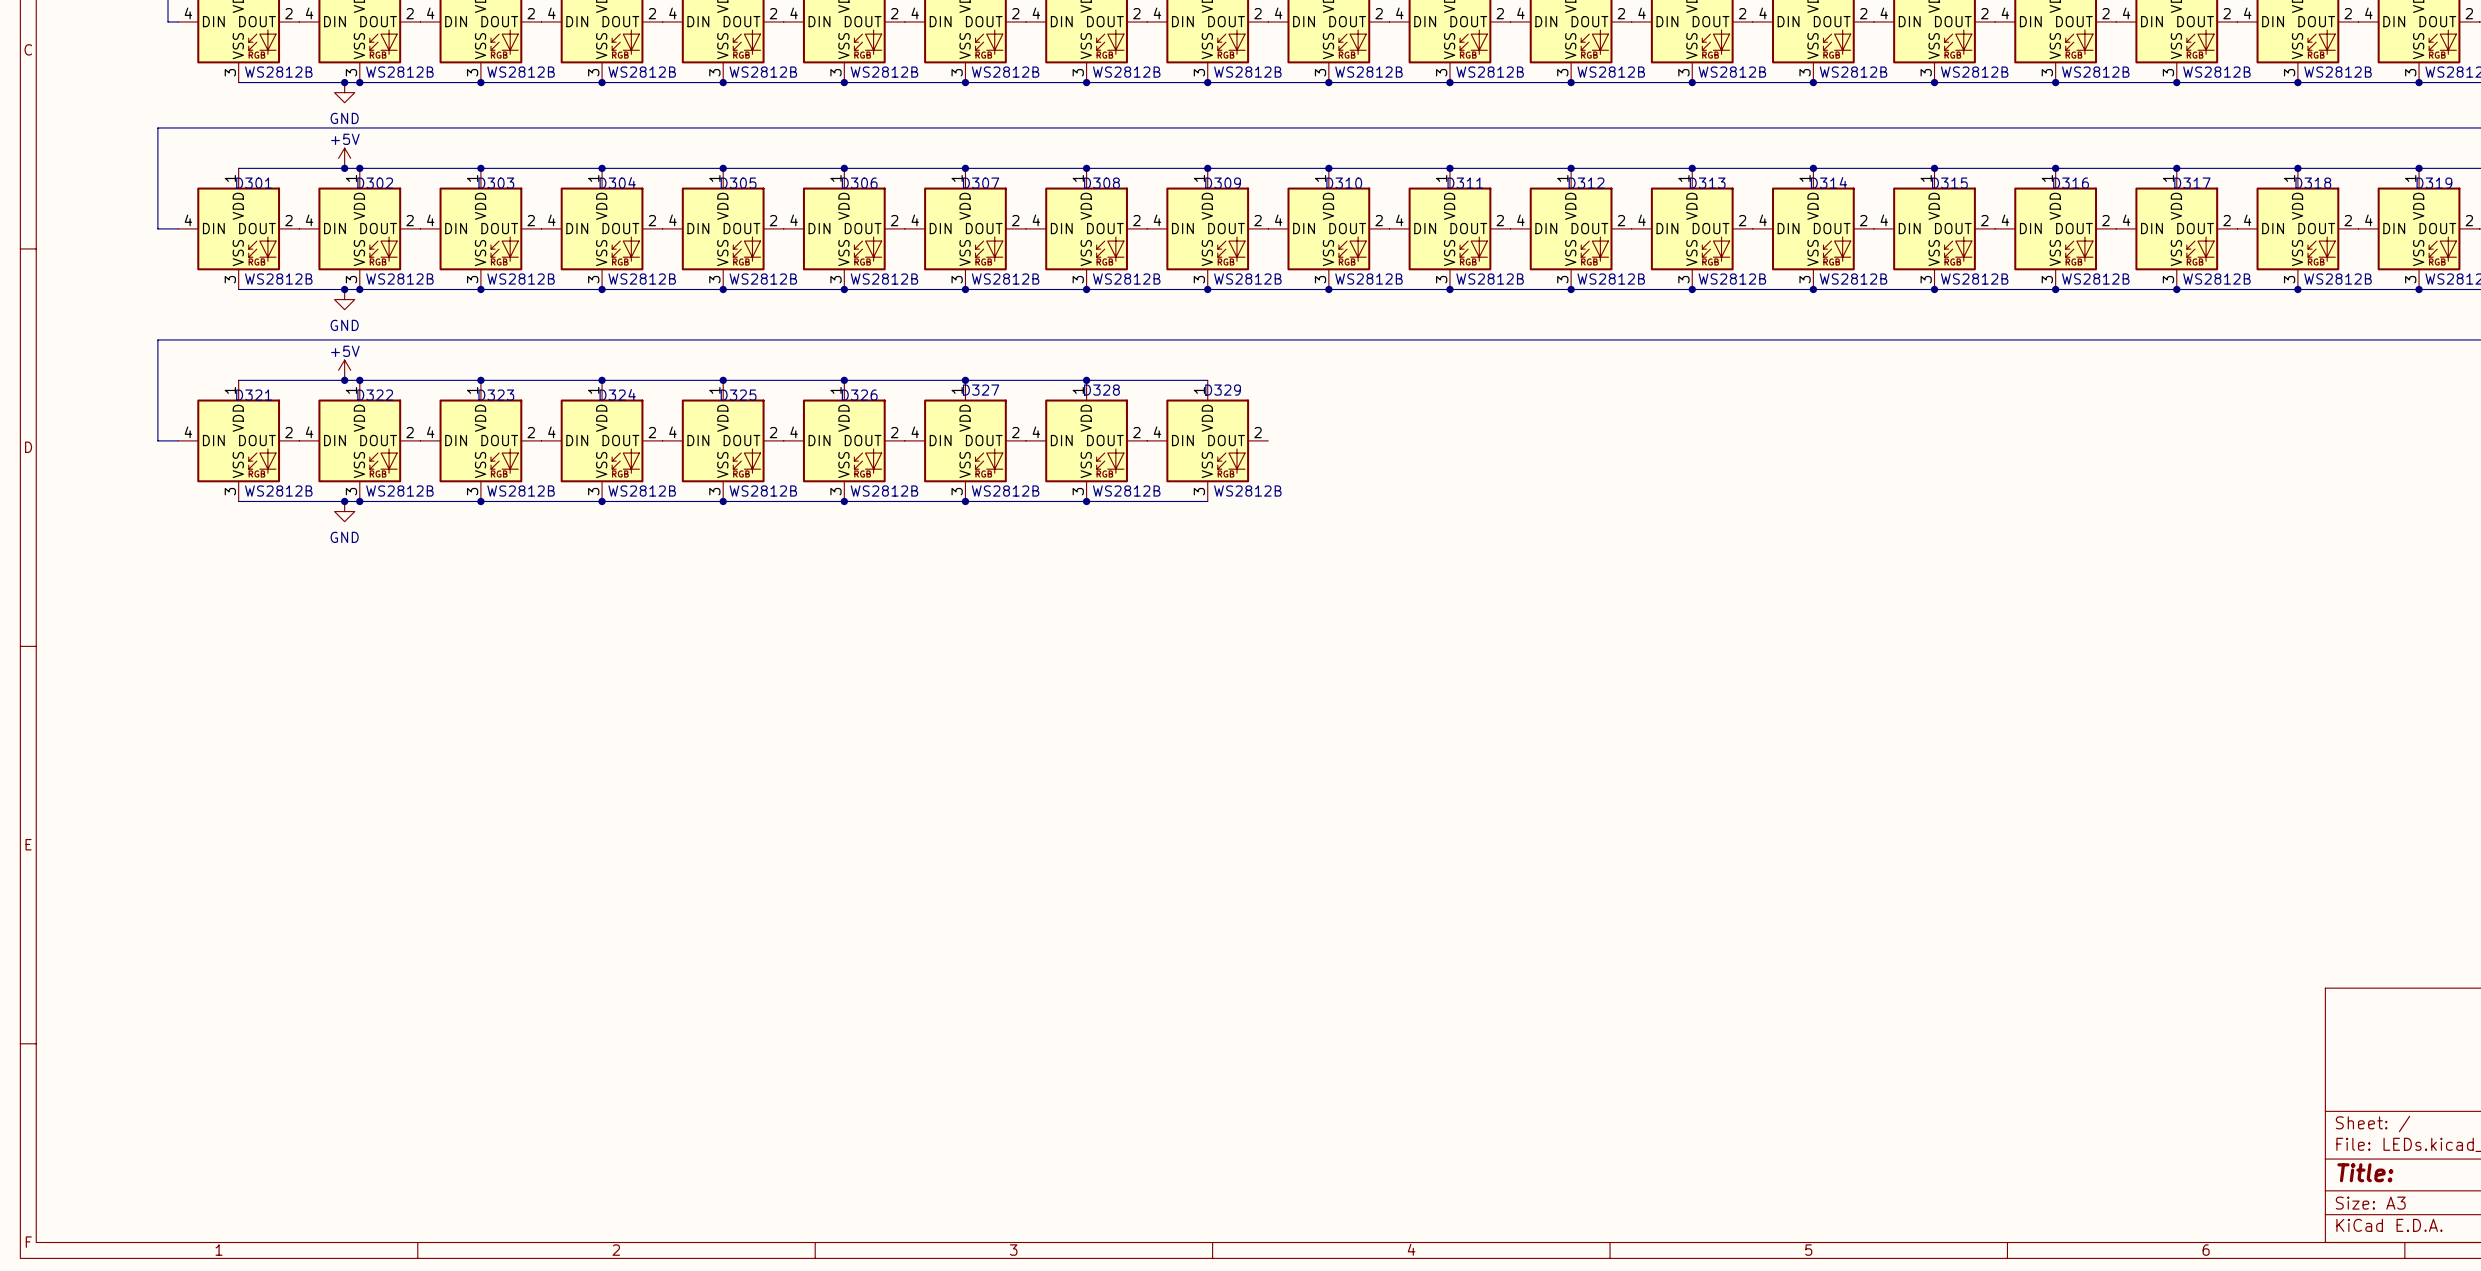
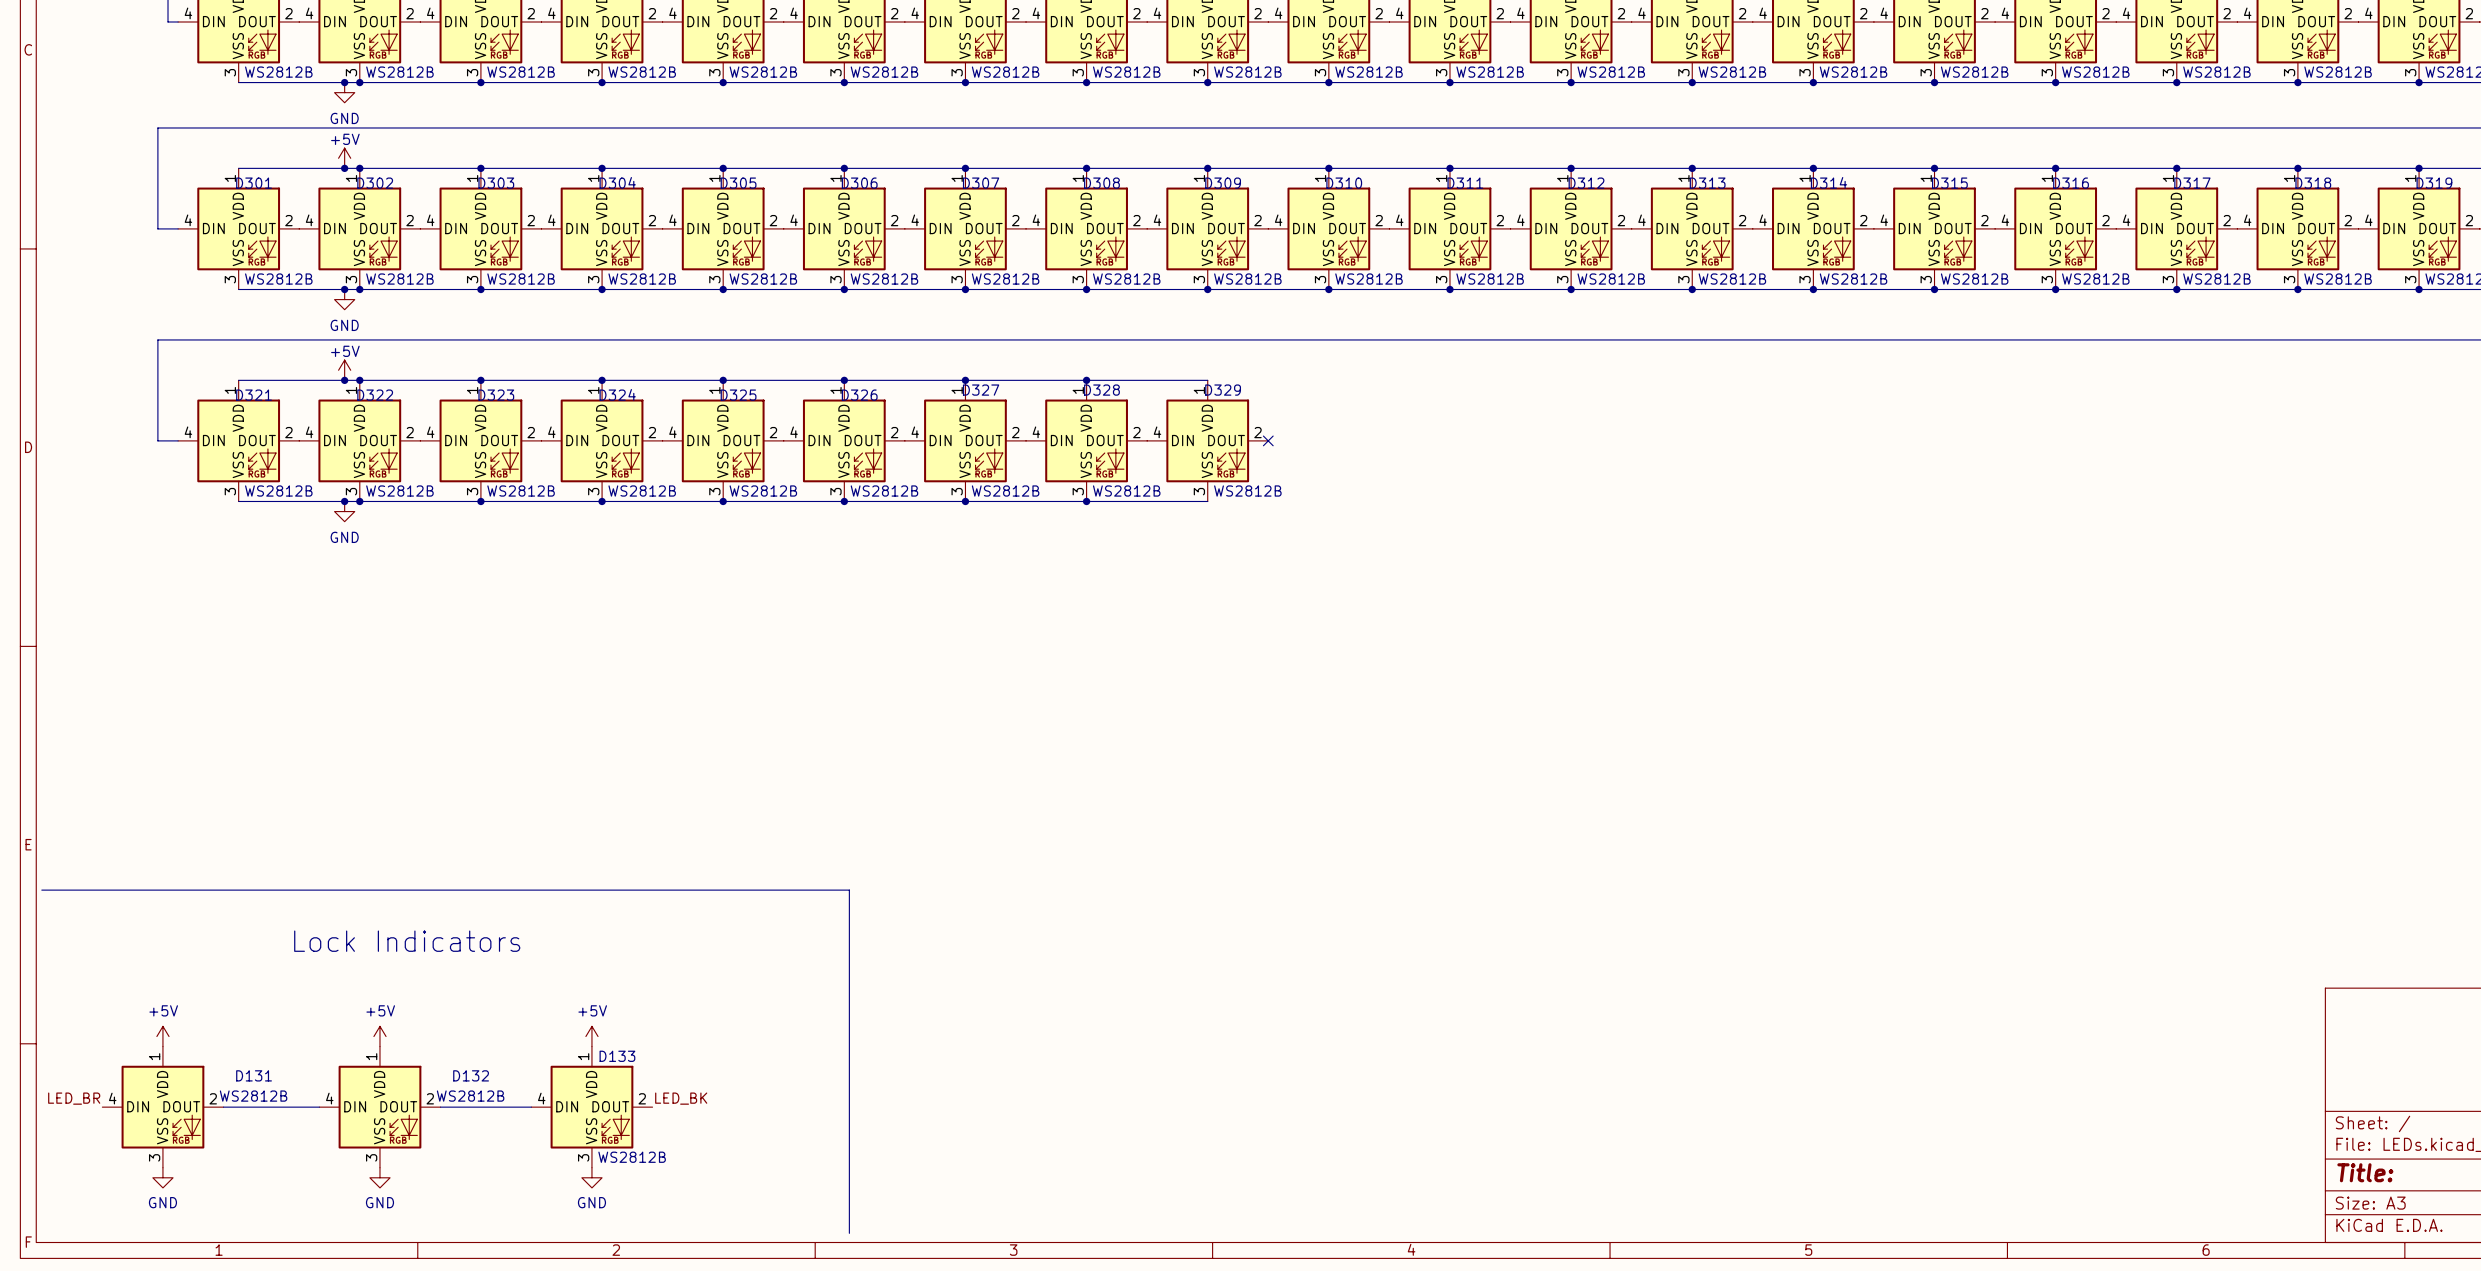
no-connect mark: none -> (1268, 440)
line: none -> (41, 890) (849, 890) (849, 1233)
text: none -> Lock Indicators (407, 941)
power symbol: none -> +5V (162, 1036)
power symbol: none -> +5V (379, 1036)
power symbol: none -> +5V (591, 1036)
label: none -> LED_BR (74, 1098)
label: none -> LED_BK (681, 1098)
D131: none -> WS2812B (162, 1107)
wire: none -> (223, 1107) (319, 1107)
D132: none -> WS2812B (379, 1107)
wire: none -> (440, 1107) (531, 1107)
D133: none -> WS2812B (591, 1107)
power symbol: none -> GND (162, 1177)
power symbol: none -> GND (379, 1177)
power symbol: none -> GND (591, 1177)

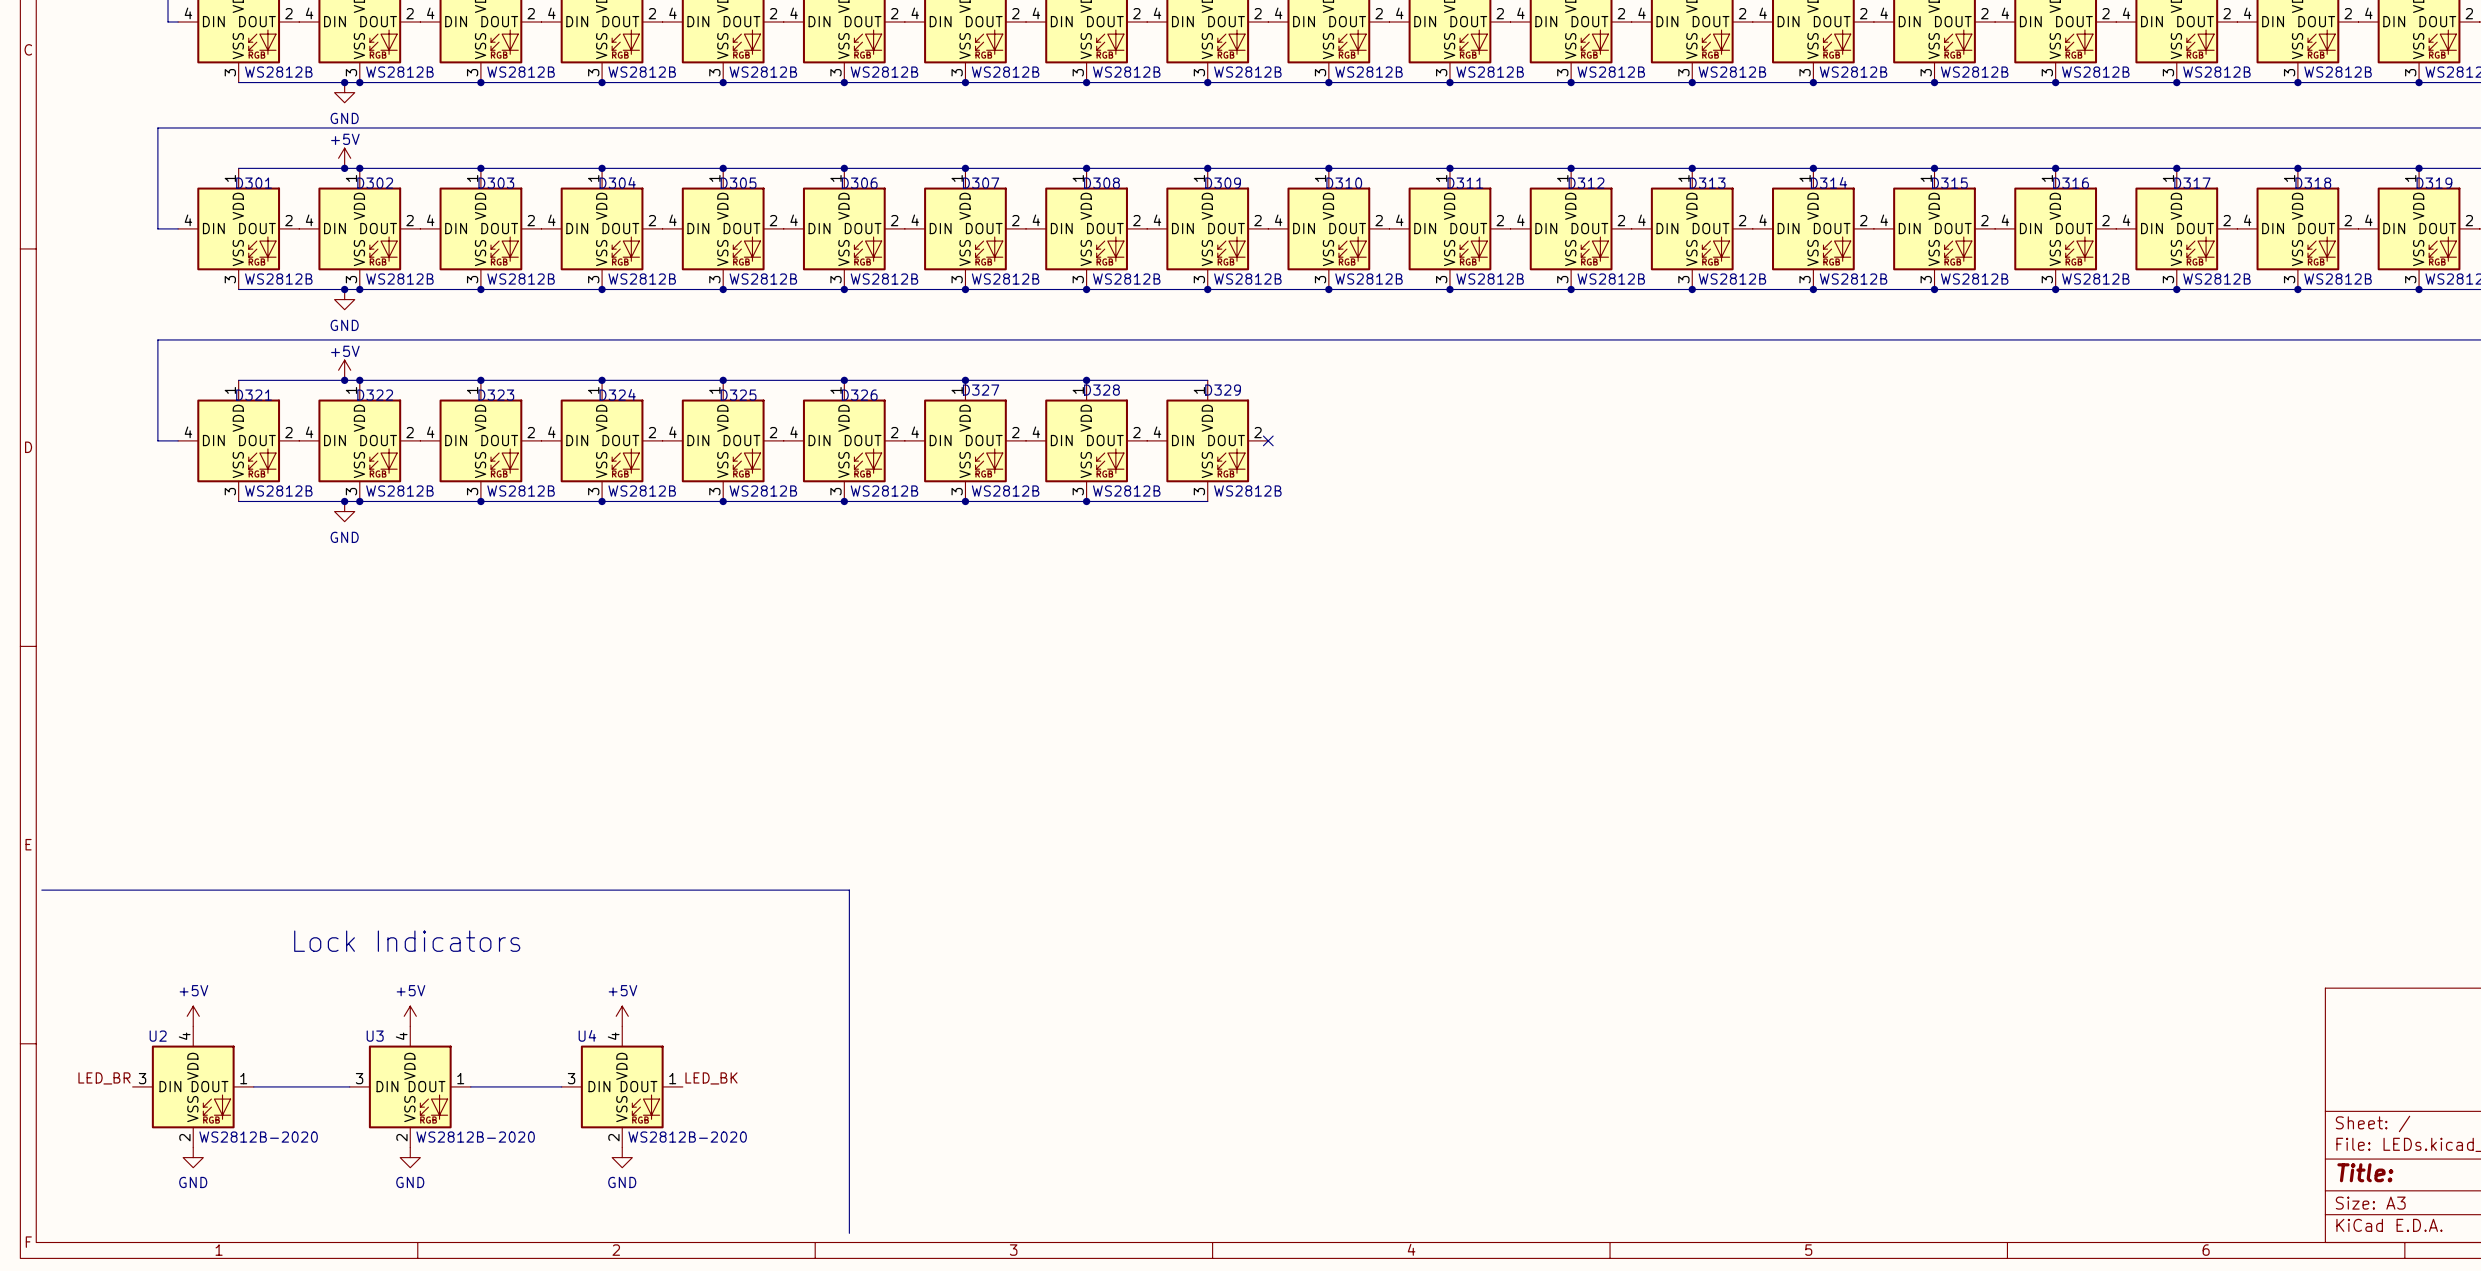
power symbol position: +5V (162, 1036) -> +5V (193, 1016)
power symbol position: +5V (379, 1036) -> +5V (410, 1016)
power symbol position: +5V (591, 1036) -> +5V (622, 1016)
U2: none -> WS2812B-2020 (193, 1086)
U3: none -> WS2812B-2020 (410, 1086)
U4: none -> WS2812B-2020 (622, 1086)
label position: LED_BR (74, 1098) -> LED_BR (104, 1078)
label position: LED_BK (681, 1098) -> LED_BK (711, 1078)
D131: WS2812B (162, 1107) -> none
wire: (223, 1107) (319, 1107) -> (253, 1086) (349, 1086)
D132: WS2812B (379, 1107) -> none
wire: (440, 1107) (531, 1107) -> (470, 1086) (561, 1086)
D133: WS2812B (591, 1107) -> none
power symbol position: GND (162, 1177) -> GND (193, 1157)
power symbol position: GND (379, 1177) -> GND (410, 1157)
power symbol position: GND (591, 1177) -> GND (622, 1157)

